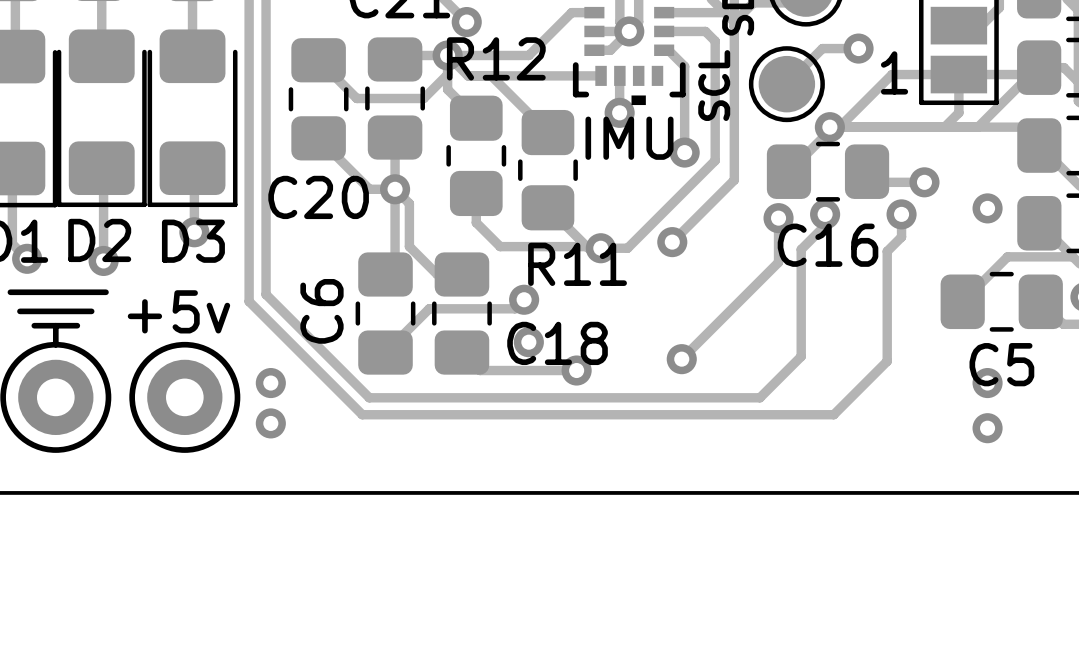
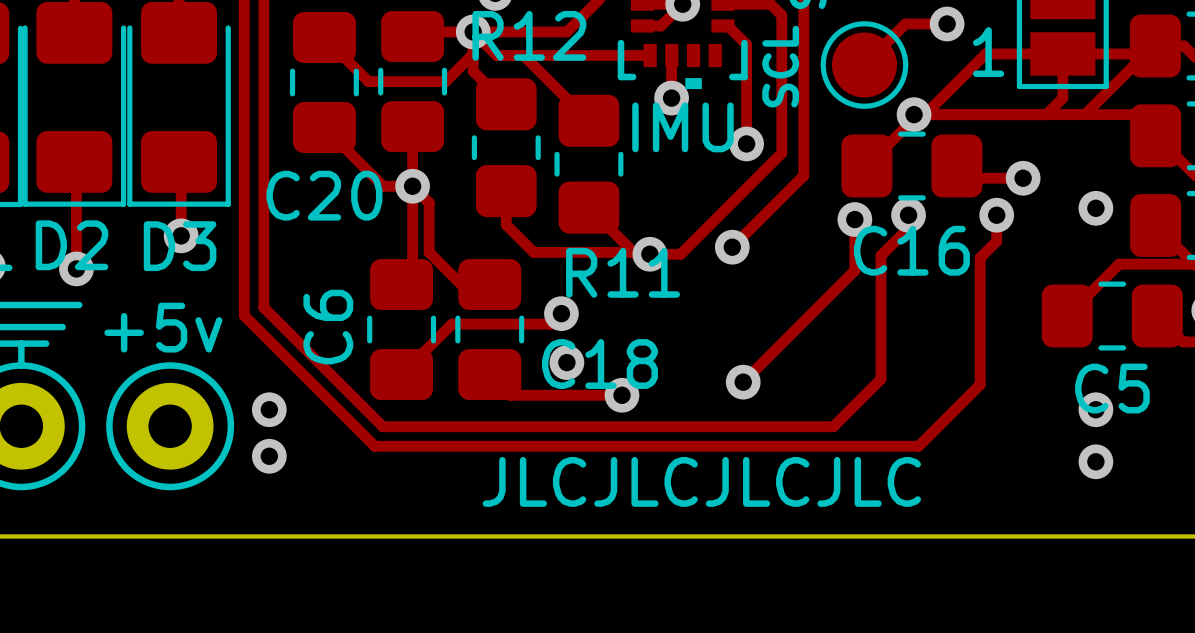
text: none -> JLCJLCJLCJLC (701, 481)

